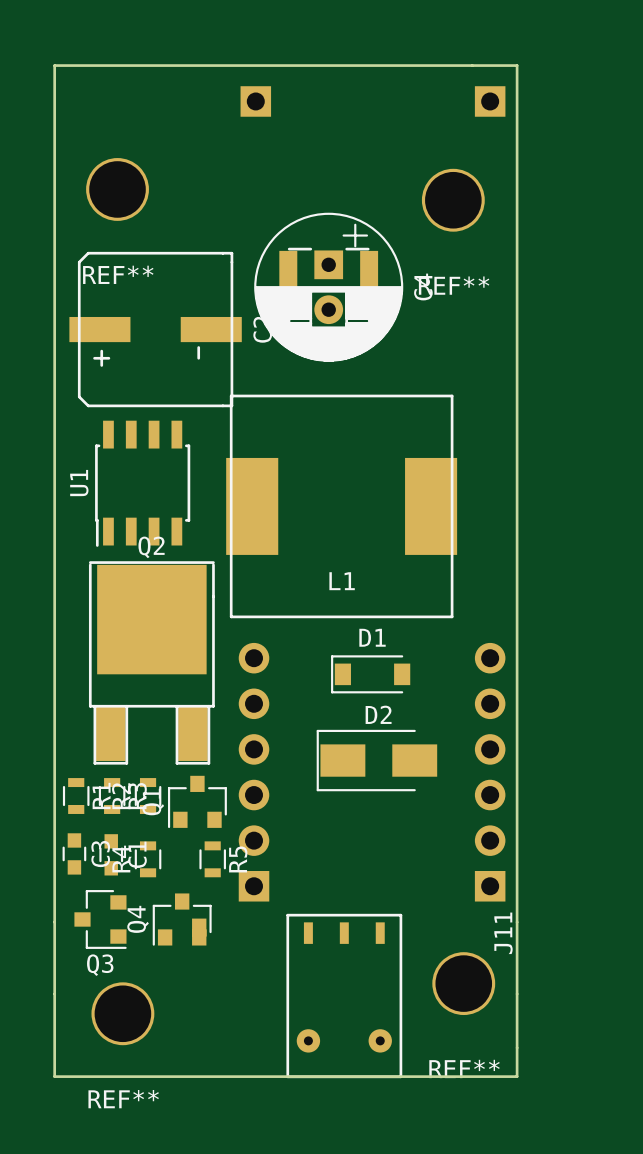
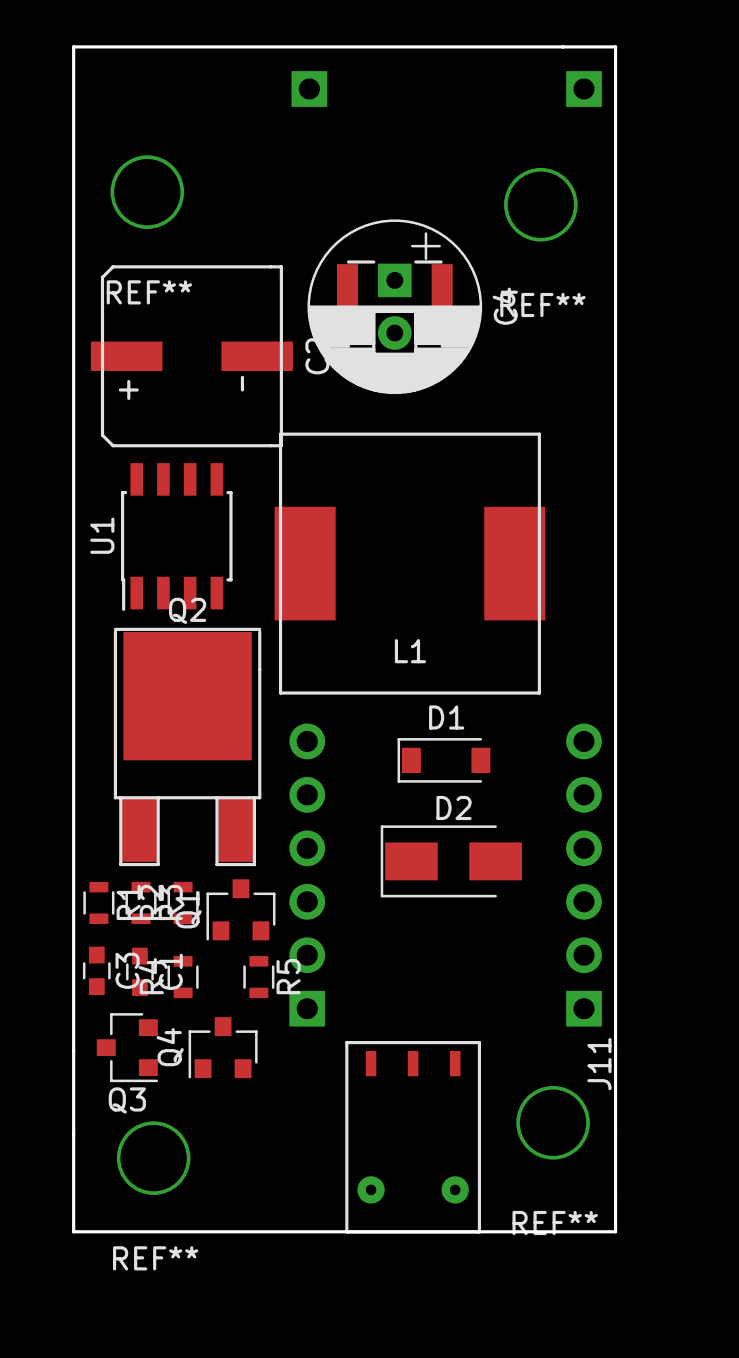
Q4 footprint: [152, 893, 212, 946] -> [188, 1017, 258, 1079]

